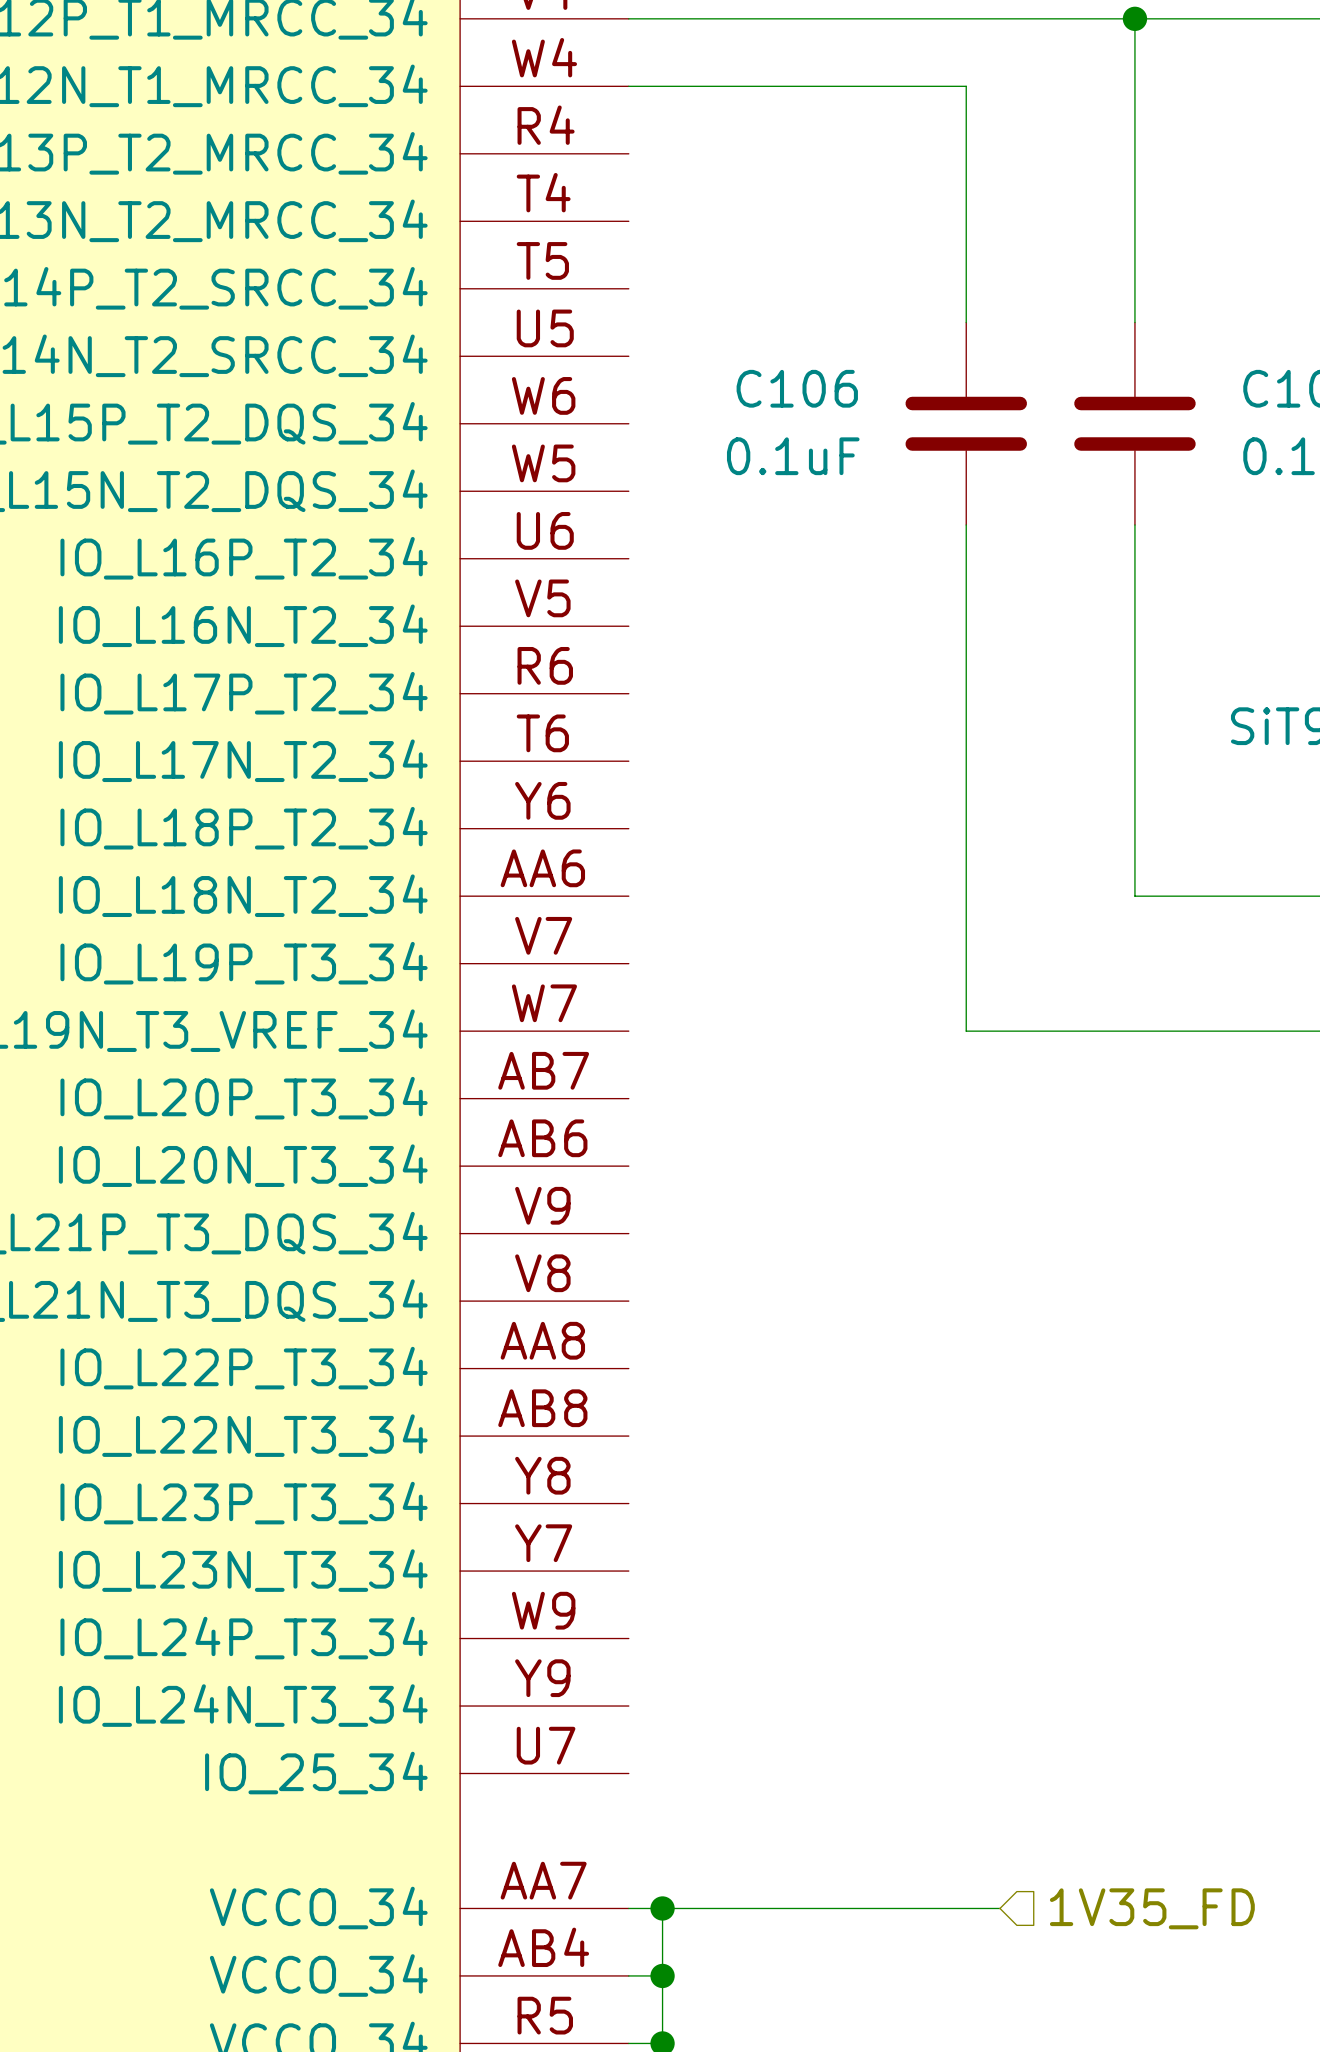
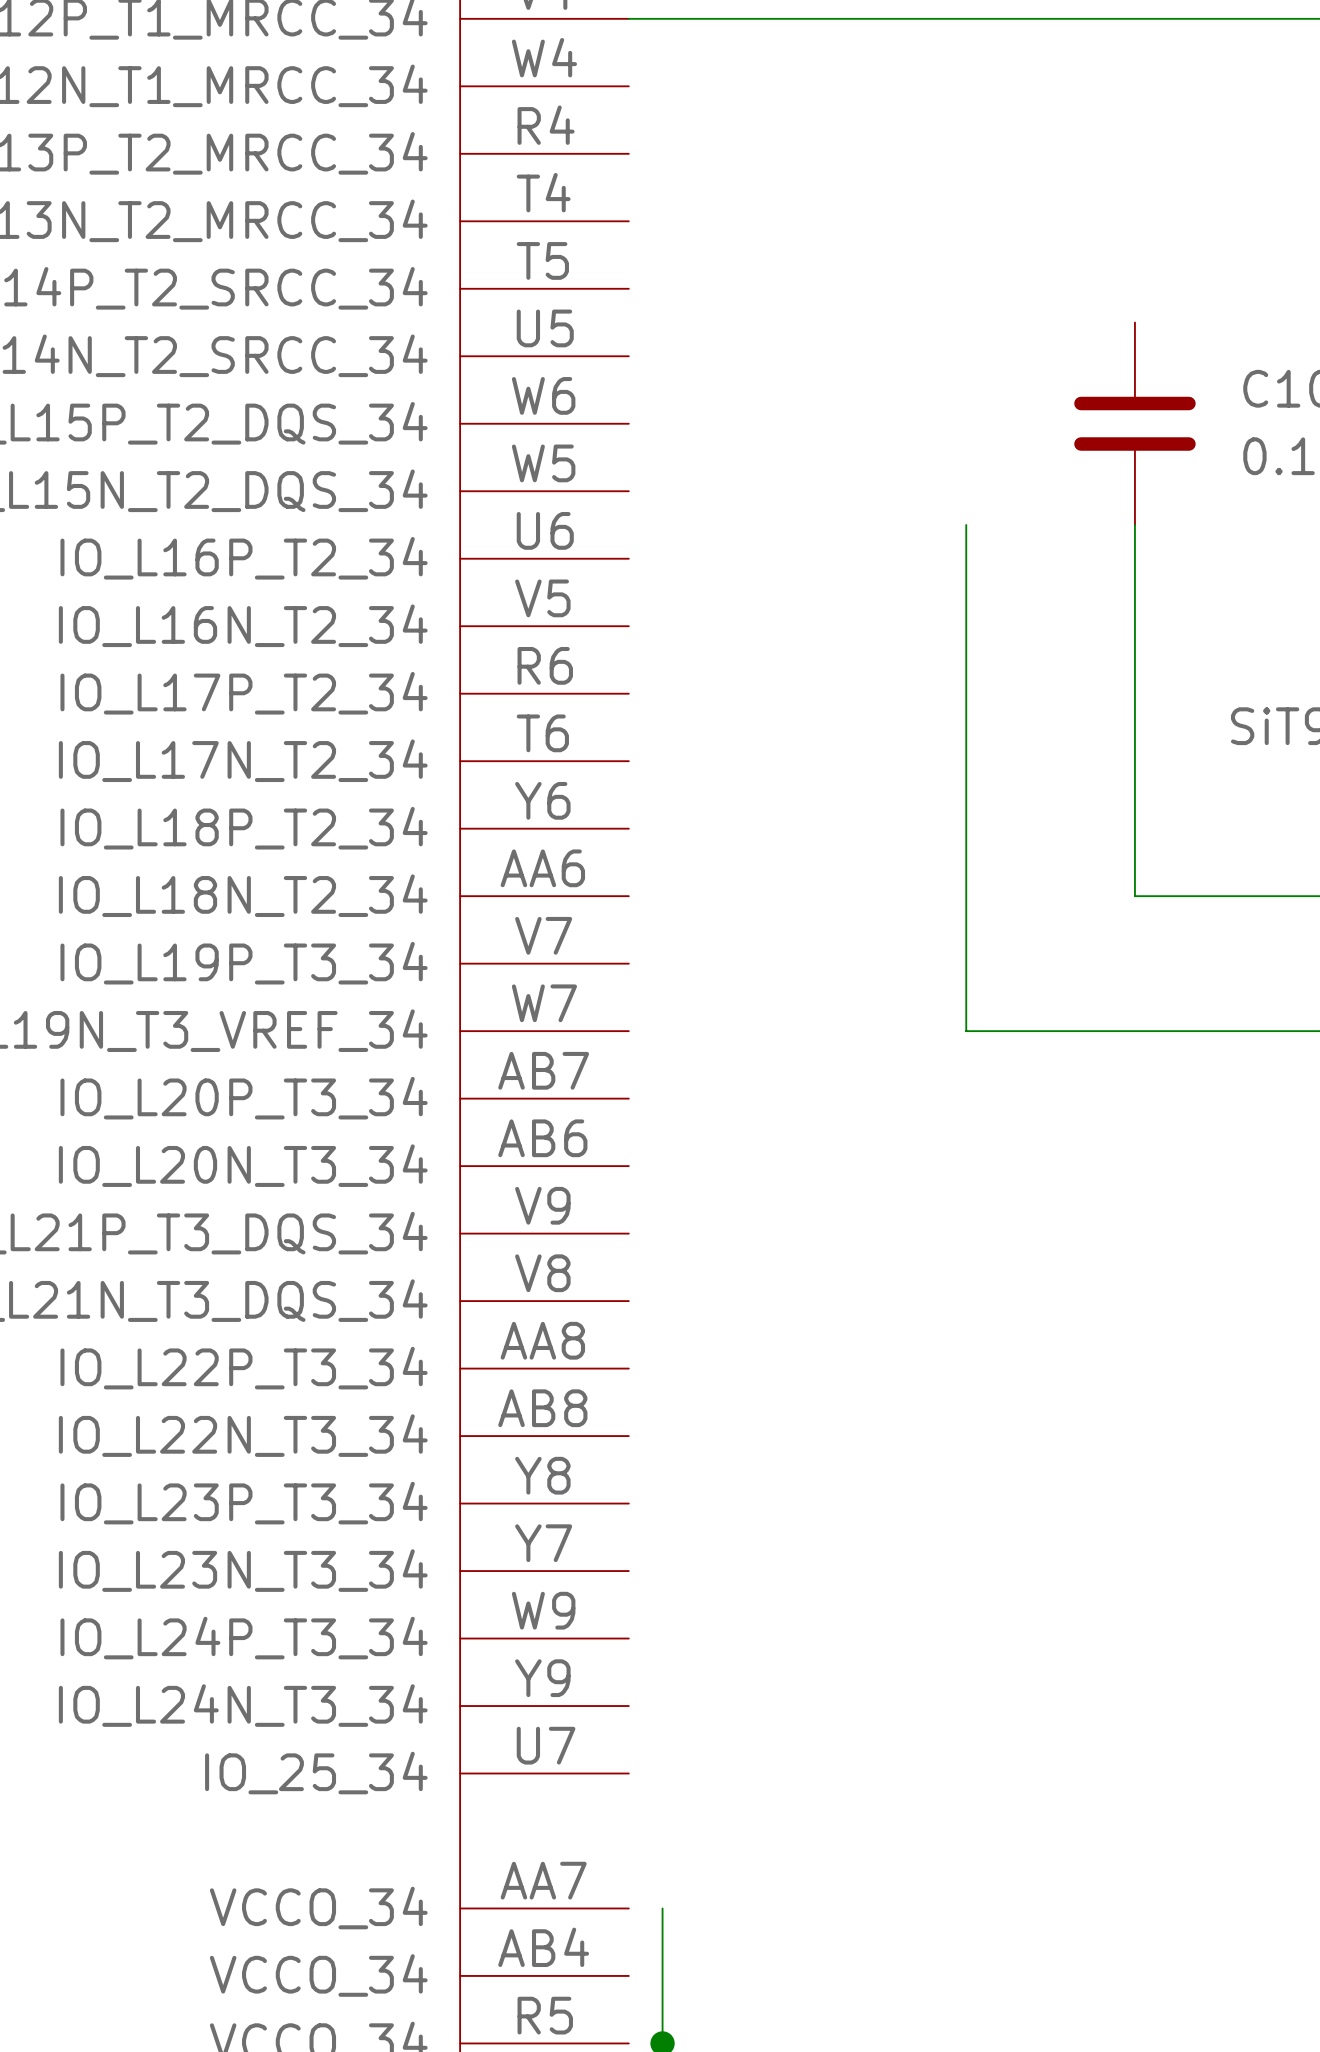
wire: (1134, 18) (1134, 322) -> none
junction: (1134, 18) -> none
wire: (628, 86) (966, 86) (966, 322) -> none
C106: 0.1uF (966, 423) -> none
wire: (628, 1908) (999, 1908) -> none
junction: (662, 1908) -> none
hierarchical label: 1V35_FD (1152, 1908) -> none
wire: (628, 1975) (662, 1975) -> none
junction: (662, 1975) -> none
wire: (628, 2043) (662, 2043) -> none

